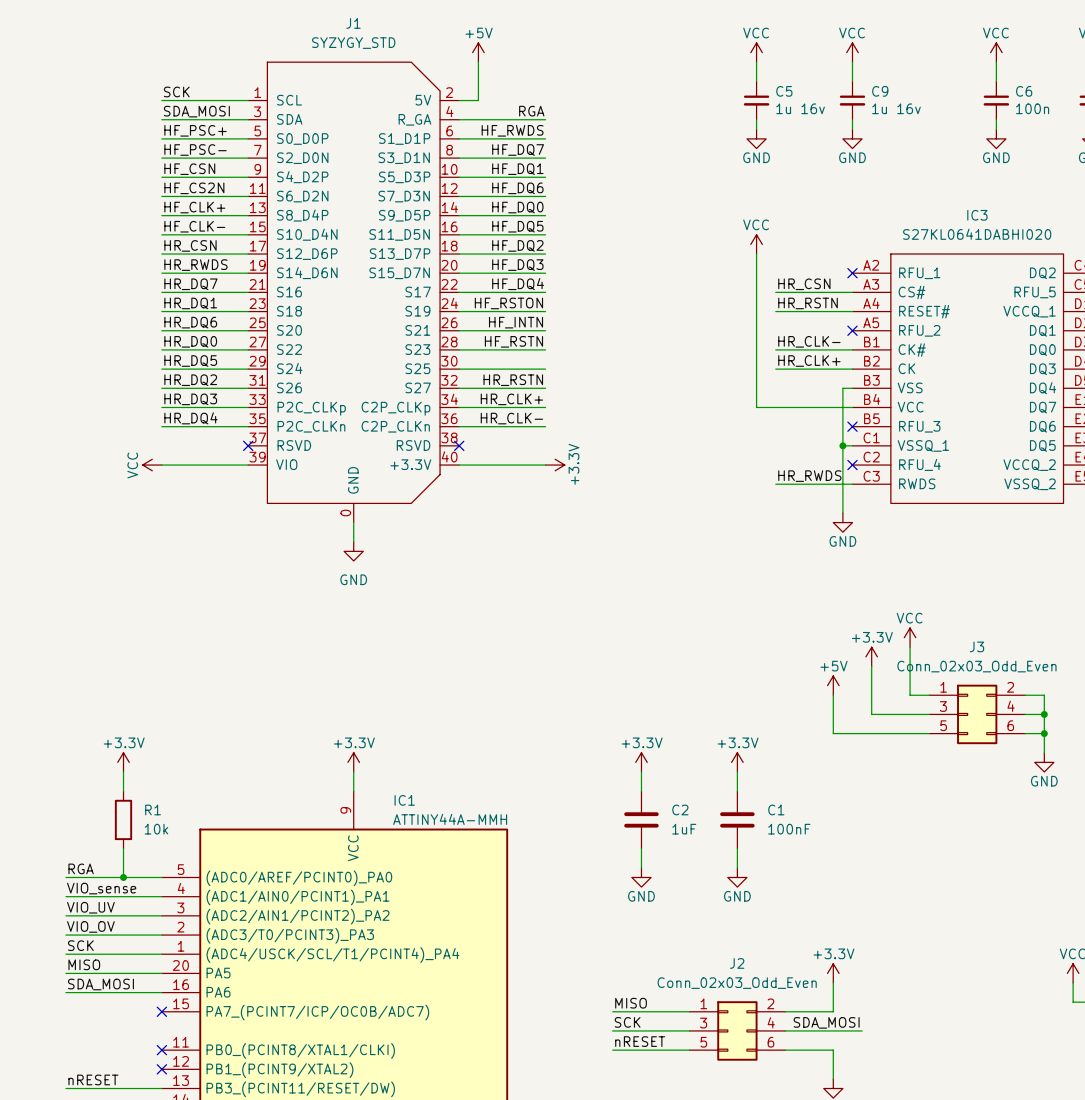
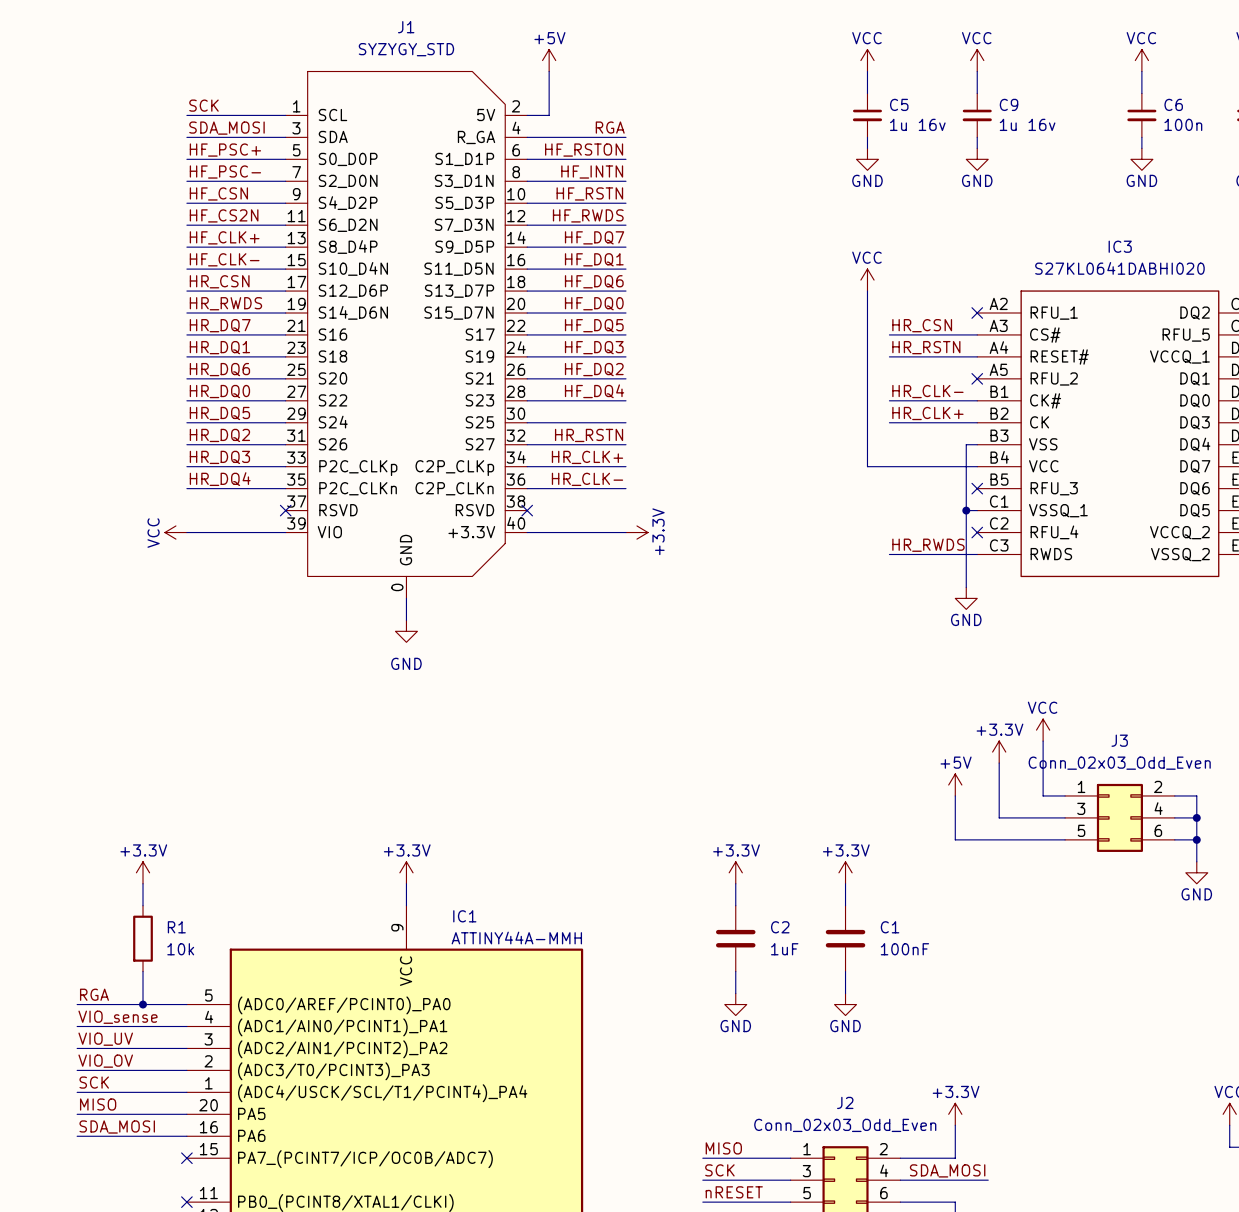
label: HF_RWDS (512, 130) -> HF_RSTON (584, 150)
label: HF_DQ7 (518, 149) -> HF_INTN (592, 172)
label: HF_DQ1 (517, 169) -> HF_RSTN (589, 193)
label: HF_DQ6 (517, 188) -> HF_RWDS (588, 215)
label: HF_DQ0 (517, 207) -> HF_DQ7 (594, 237)
label: HF_DQ5 (517, 226) -> HF_DQ1 (594, 259)
label: HF_DQ2 (517, 245) -> HF_DQ6 (594, 281)
label: HF_DQ3 (517, 265) -> HF_DQ0 (594, 303)
label: HF_DQ4 (518, 284) -> HF_DQ5 (594, 325)
label: HF_RSTON (508, 303) -> HF_DQ3 (594, 347)
label: HF_INTN (516, 322) -> HF_DQ2 (594, 369)
label: HF_RSTN (513, 341) -> HF_DQ4 (594, 391)

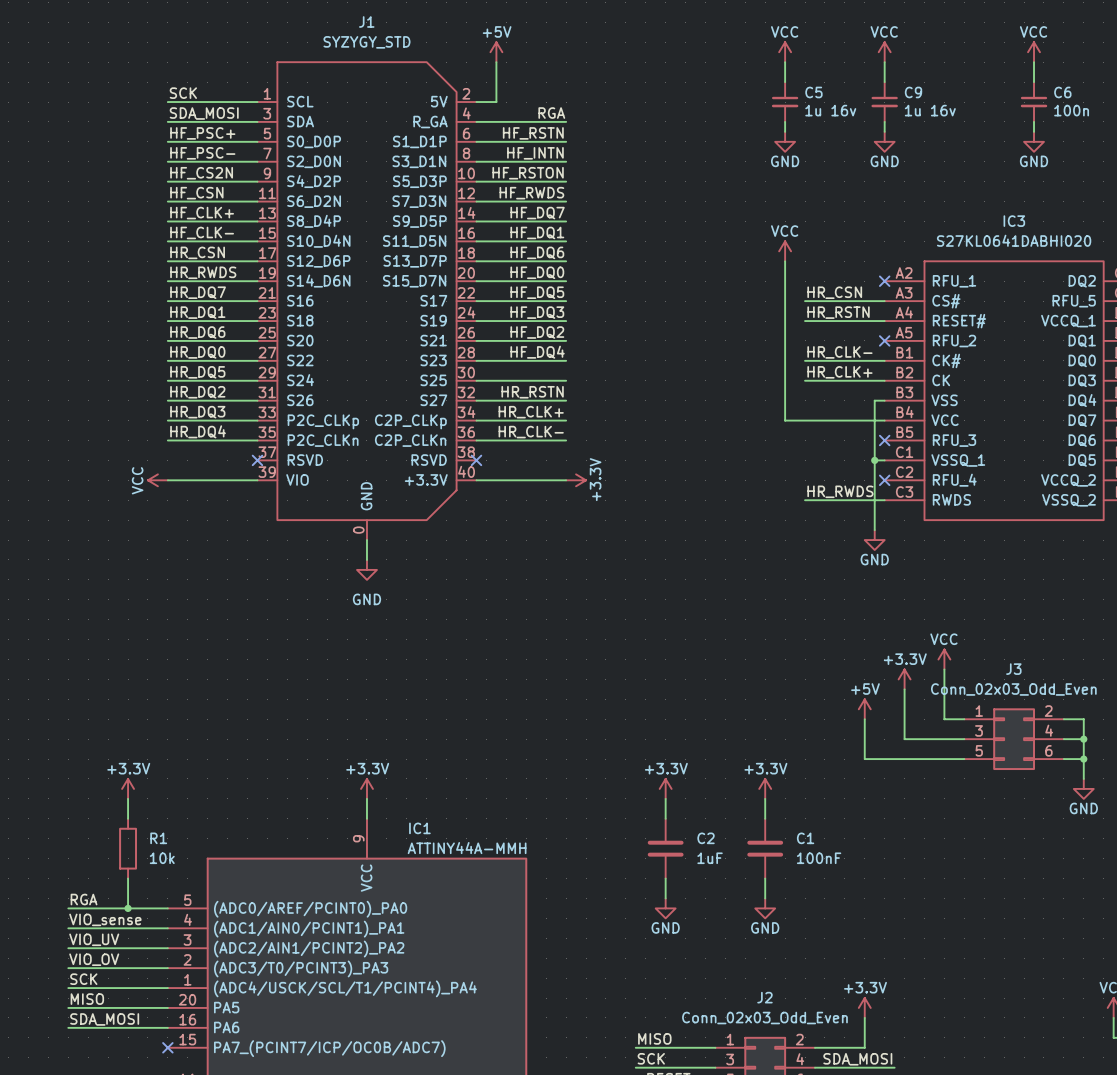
label: HF_RSTON (584, 150) -> HF_RSTN (533, 133)
label: HF_CSN (218, 193) -> HF_CS2N (201, 173)
label: HF_RSTN (589, 193) -> HF_RSTON (528, 173)
label: HF_CS2N (224, 215) -> HF_CSN (196, 193)

